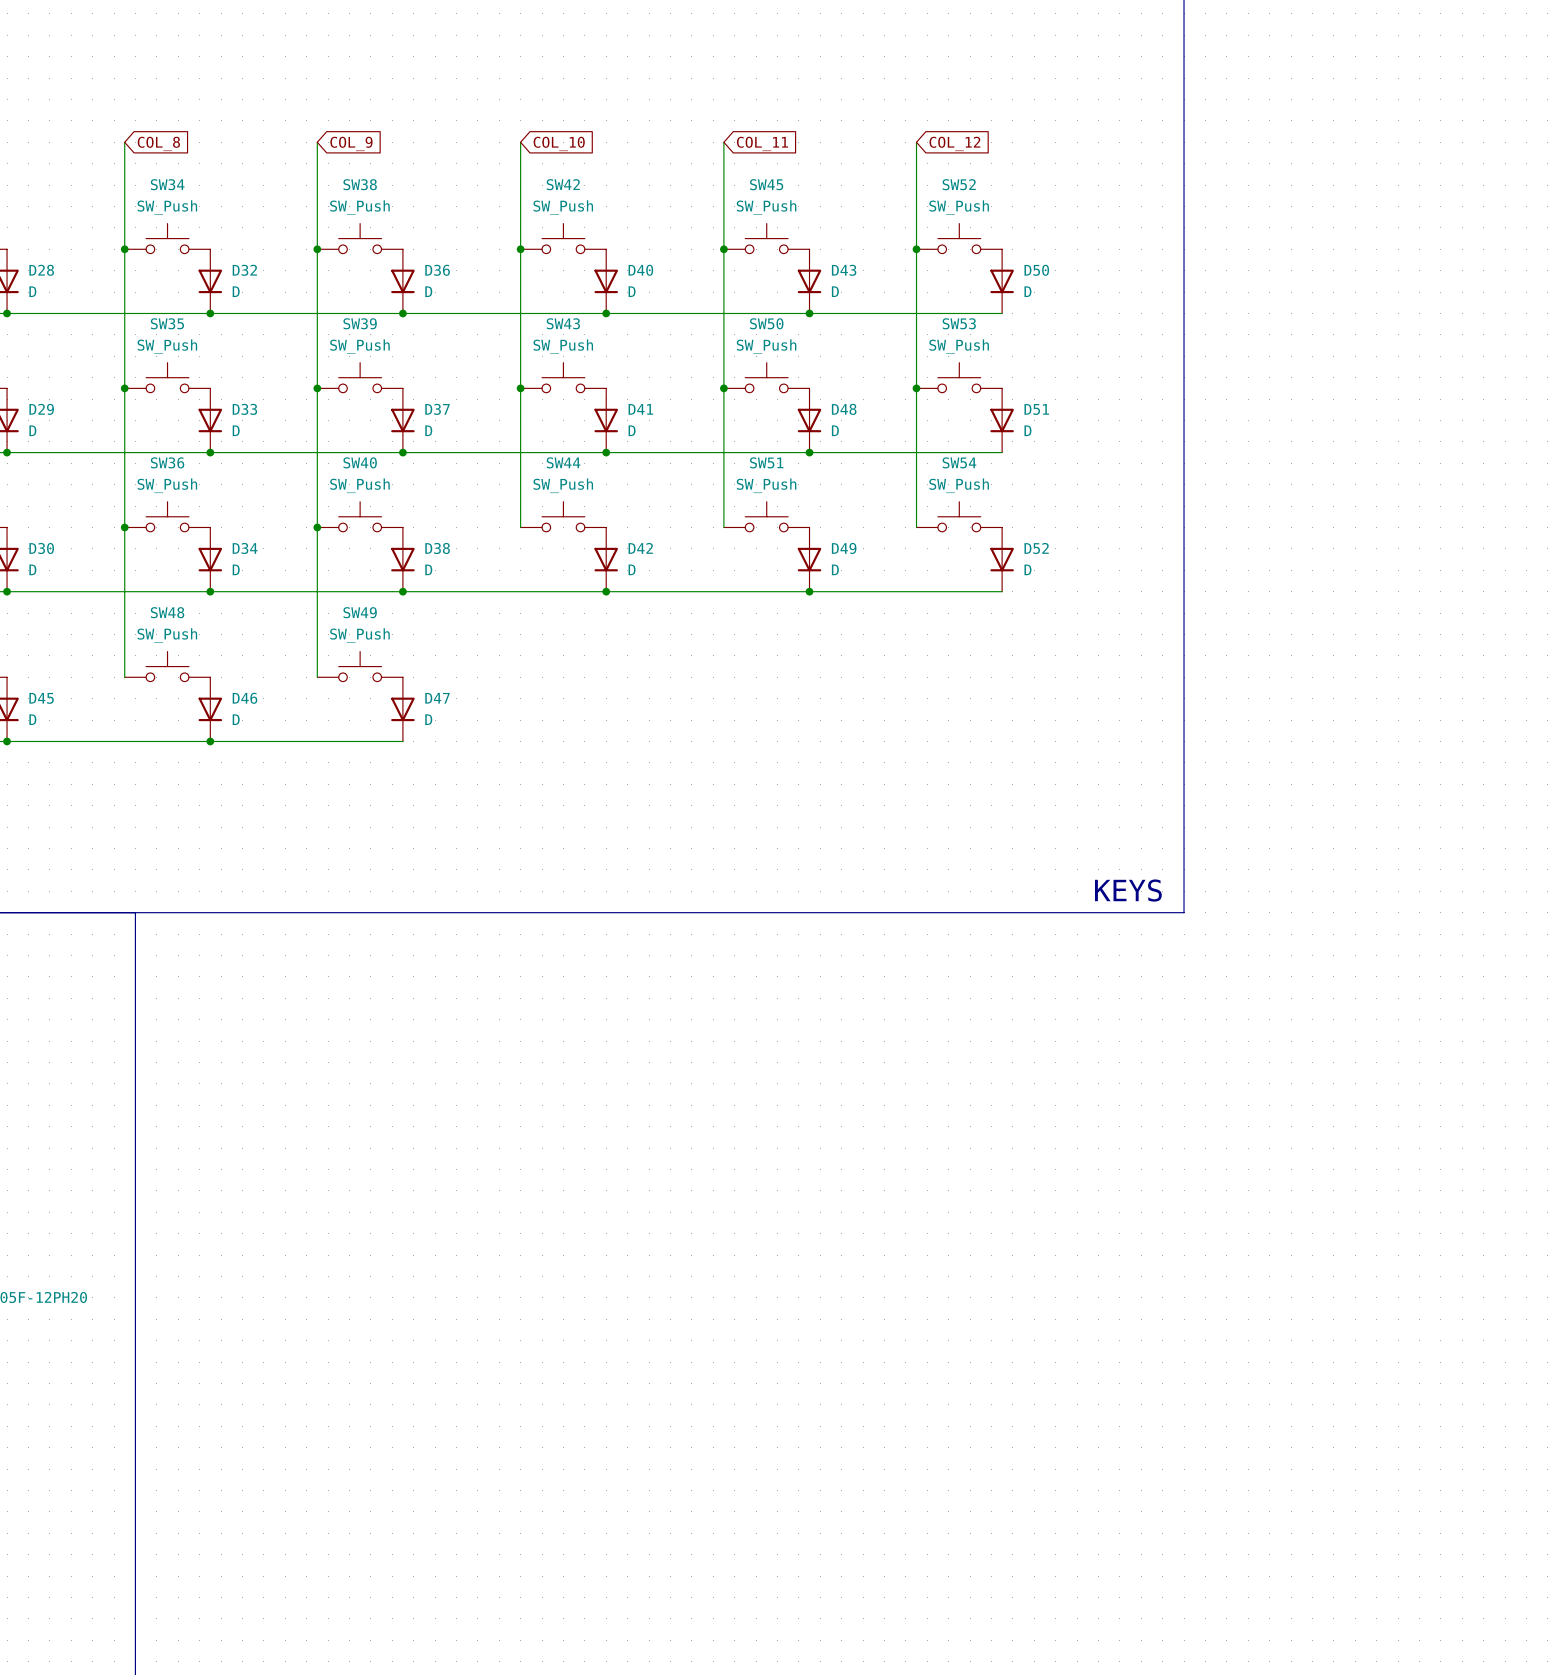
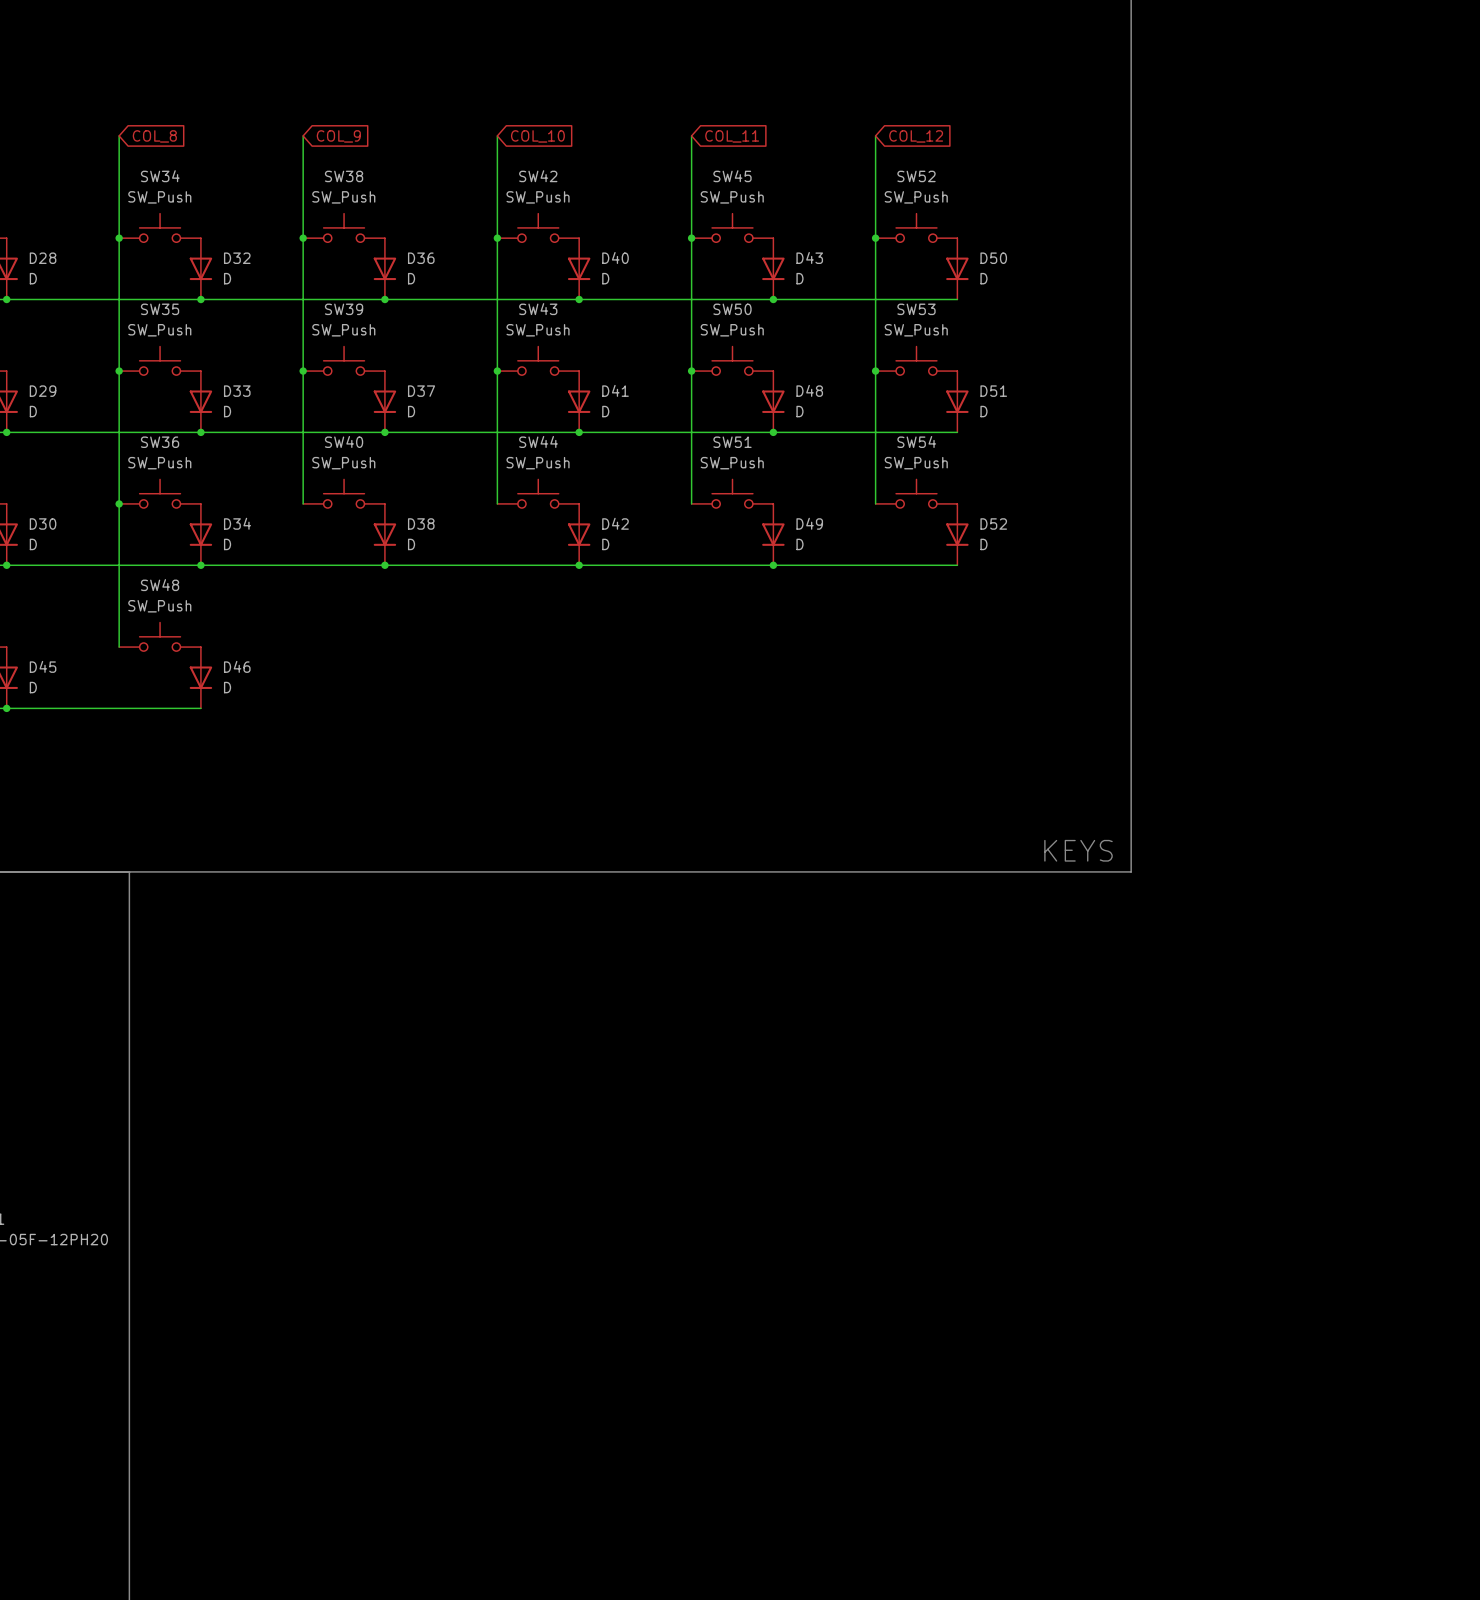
wire: (317, 527) (317, 677) -> none
junction: (317, 527) -> none
SW49: SW_Push (360, 666) -> none
D47: D (402, 709) -> none
wire: (210, 741) (402, 741) -> none
junction: (210, 741) -> none

